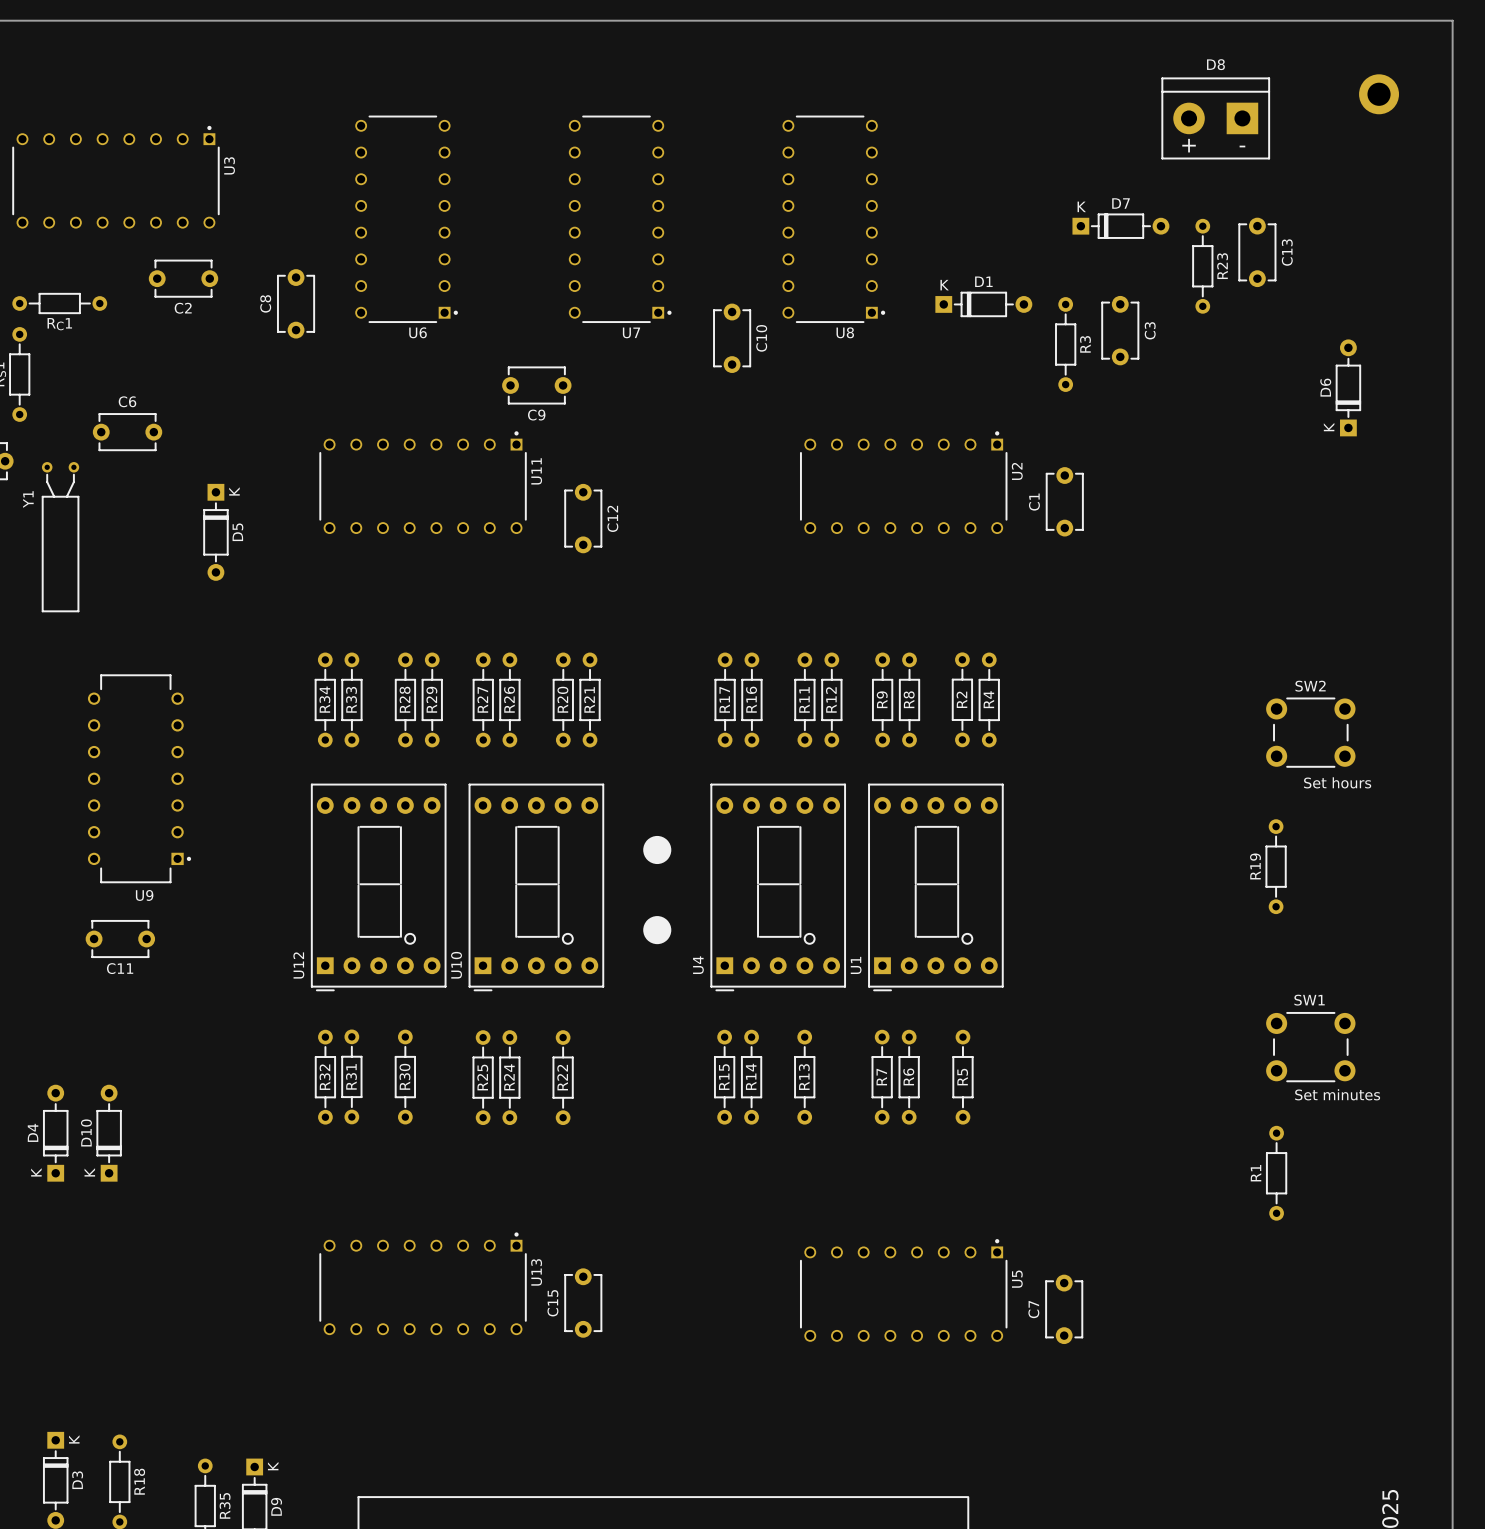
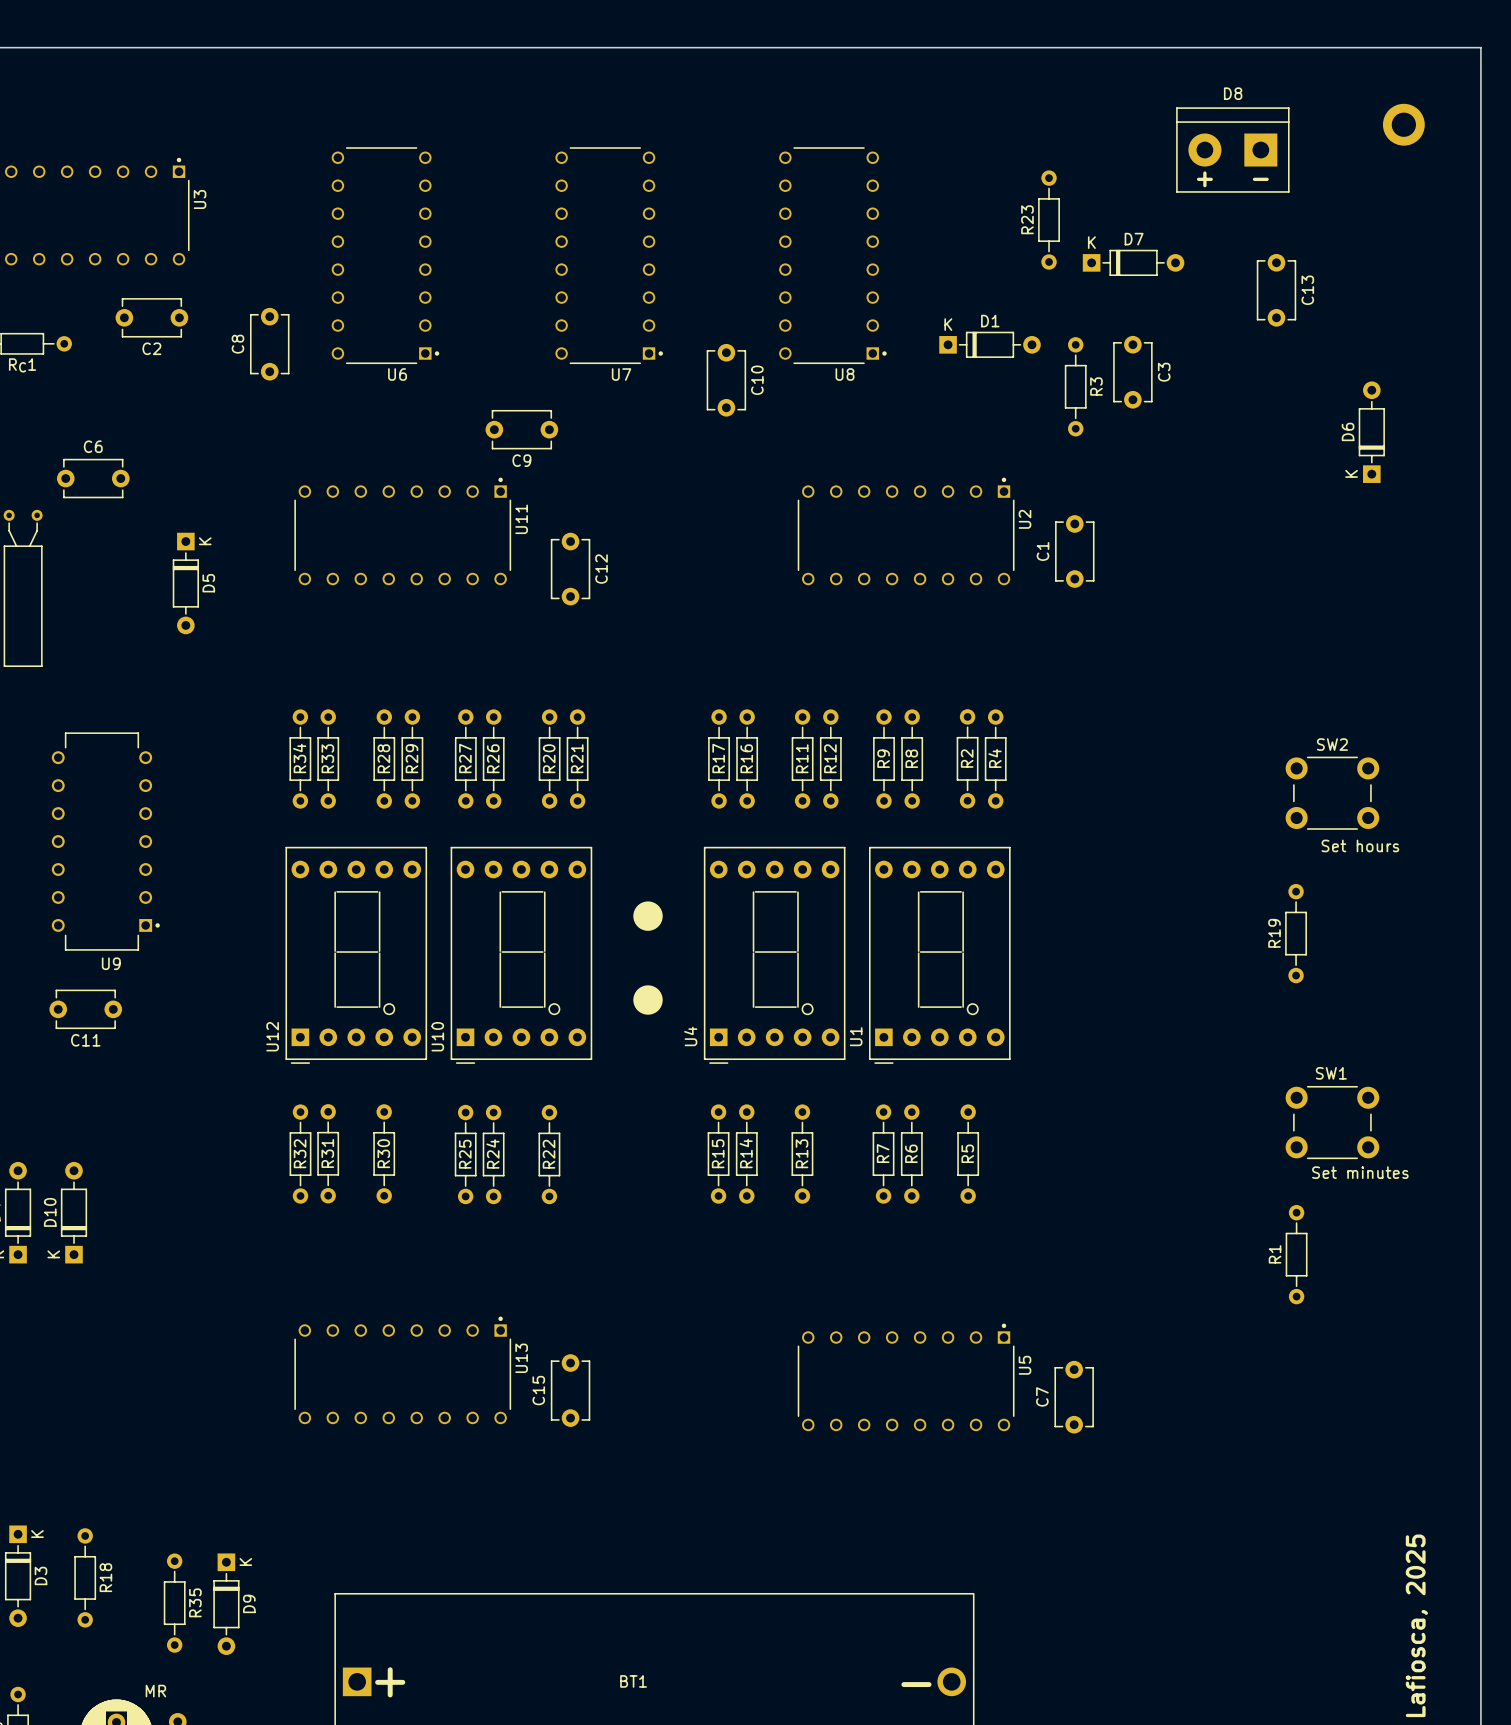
R23 position: (1202, 266) -> (1049, 220)
R23 name position: R23 (1222, 266) -> R23 (1027, 219)

